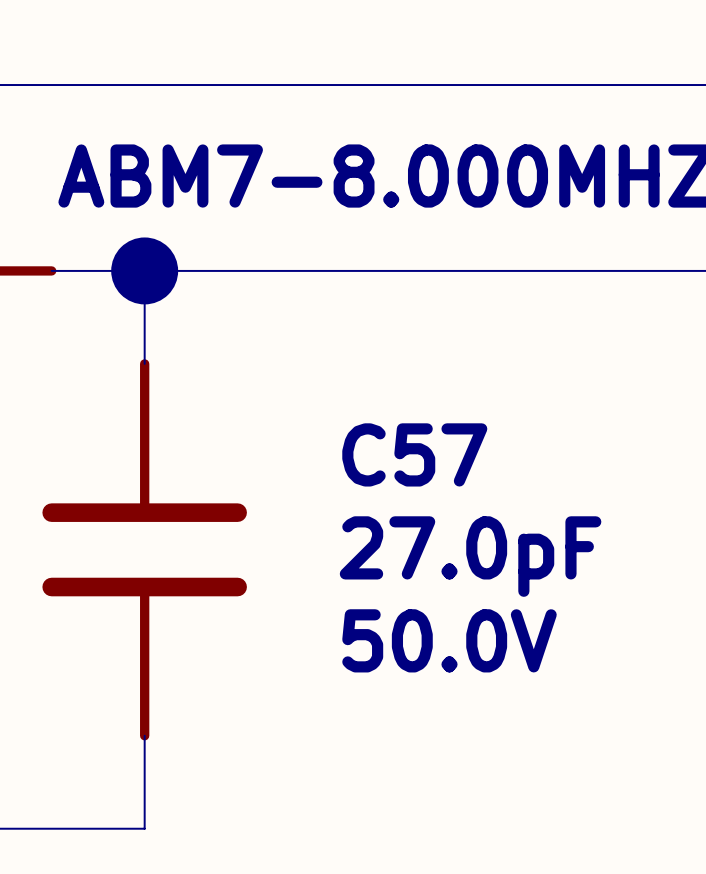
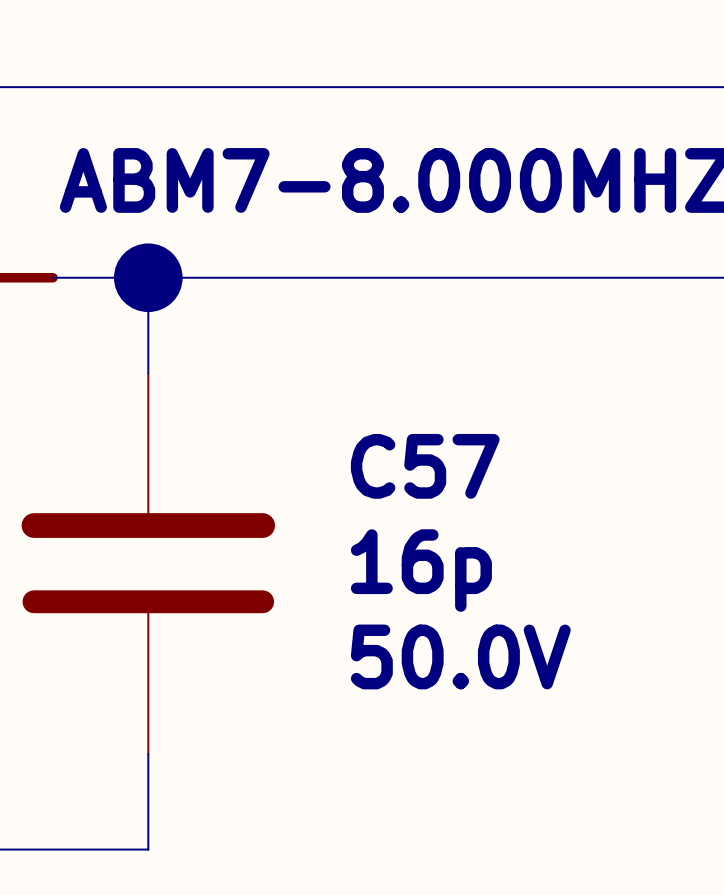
C57 symbol: [42, 359, 247, 741] -> [21, 373, 276, 755]
C57 value: 27.0pF (470, 556) -> 16p (421, 570)

